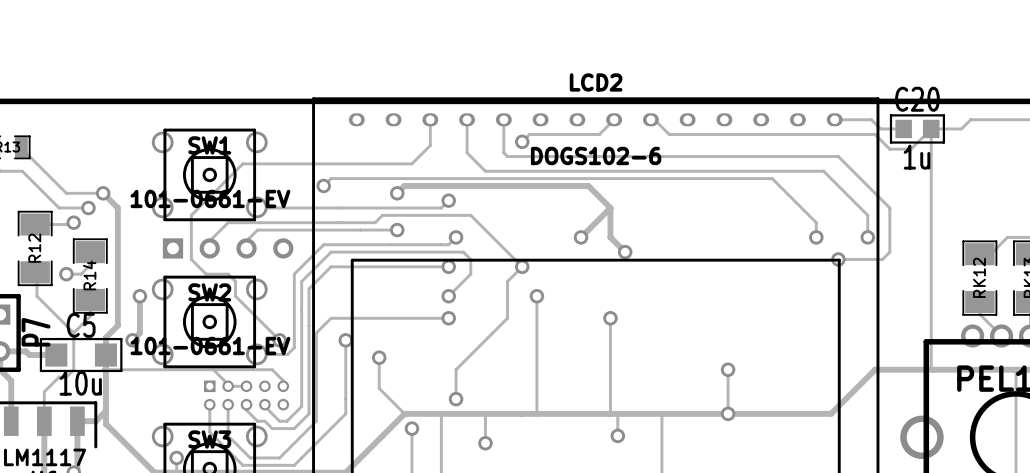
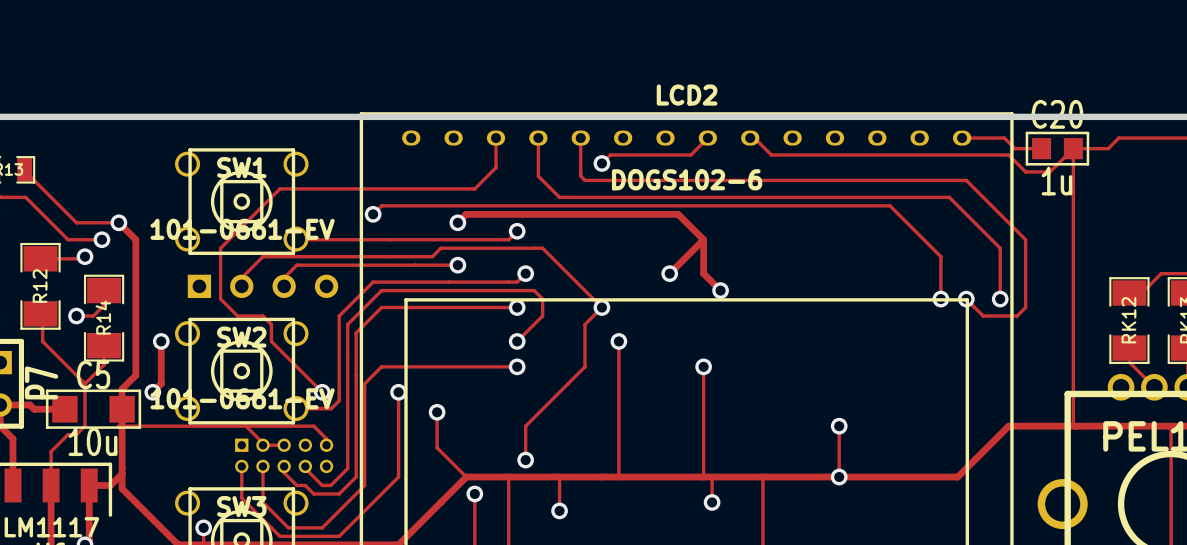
track: none -> (940, 273) (940, 299)
via position: (816, 237) -> (940, 299)
track: none -> (1000, 273) (1000, 299)
via position: (867, 237) -> (1000, 299)
track: (889, 252) (882, 259) (838, 259) -> (1025, 290) (1025, 307) (1017, 316) (983, 316) (966, 299)

